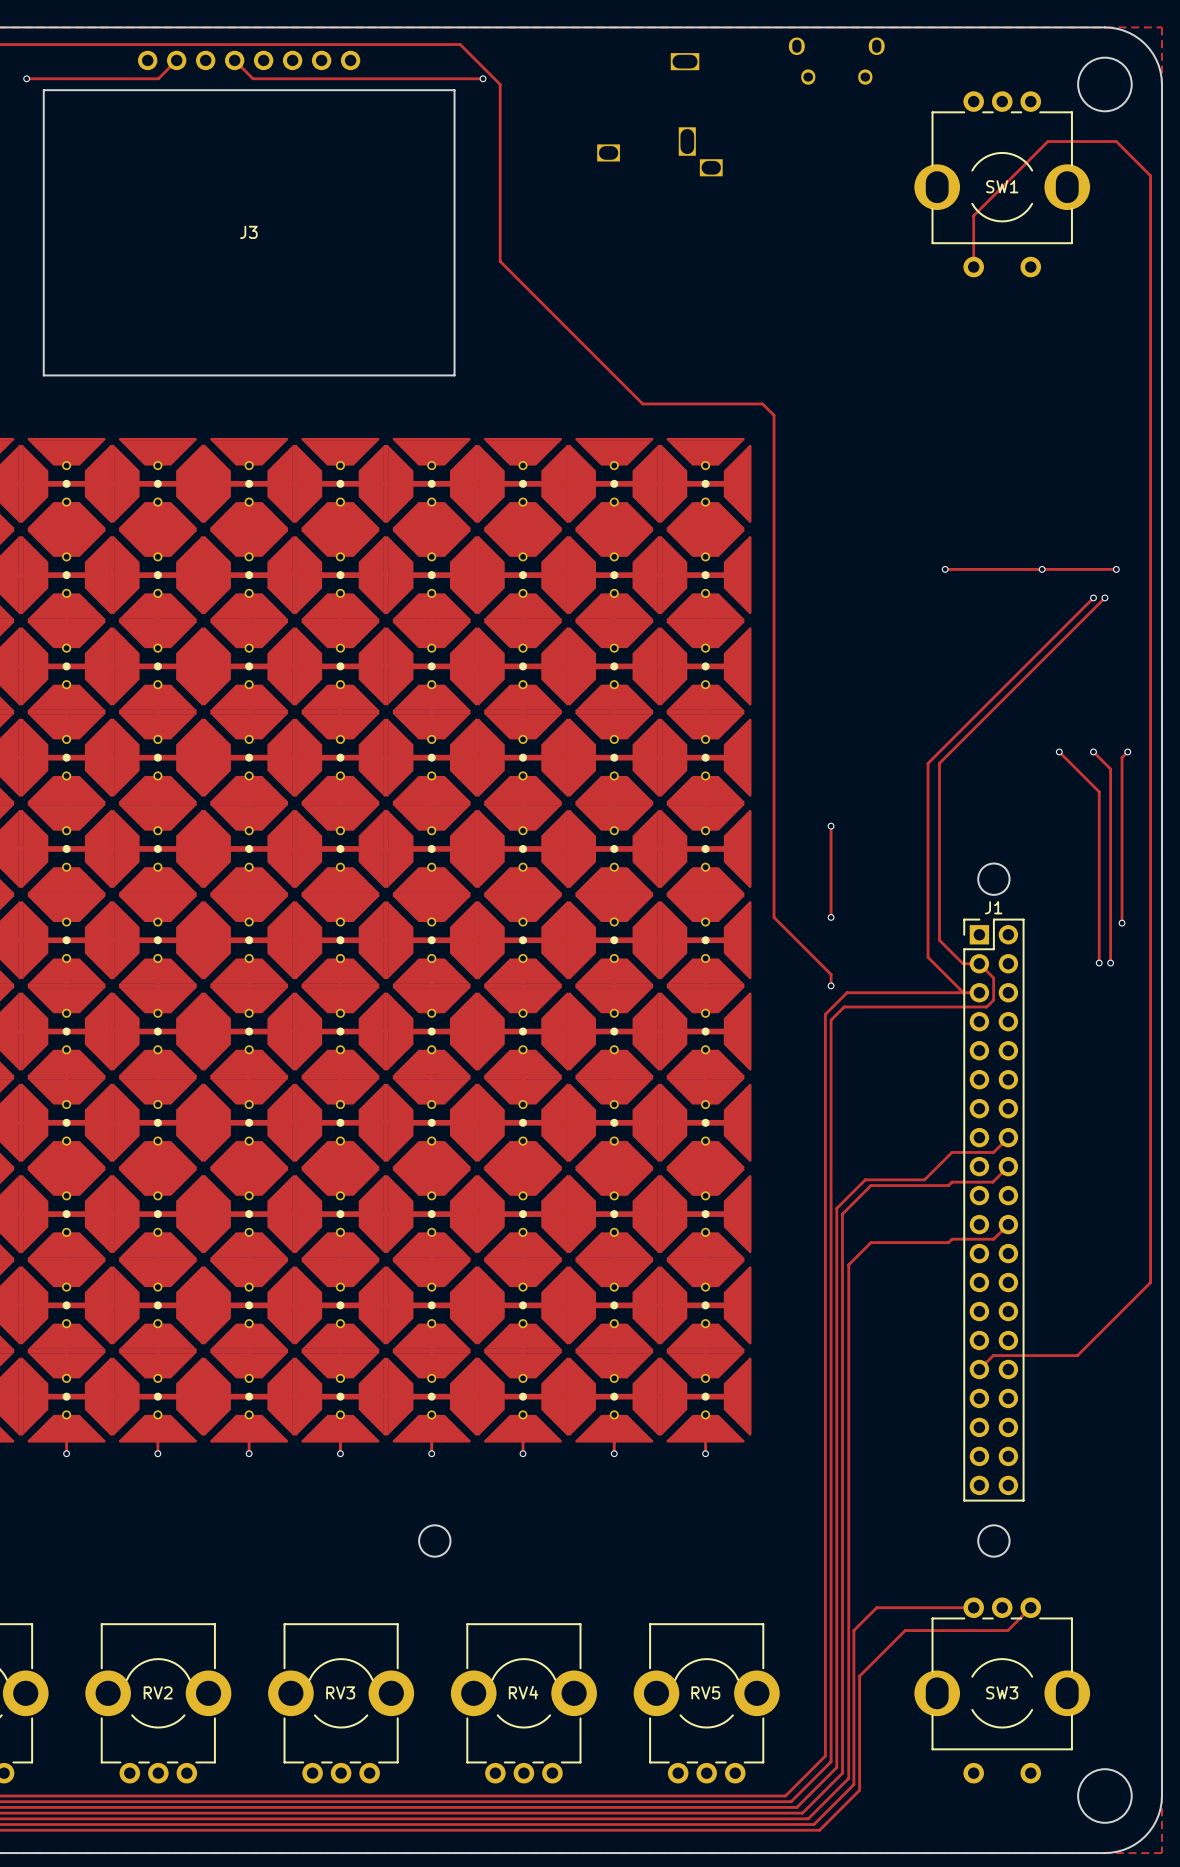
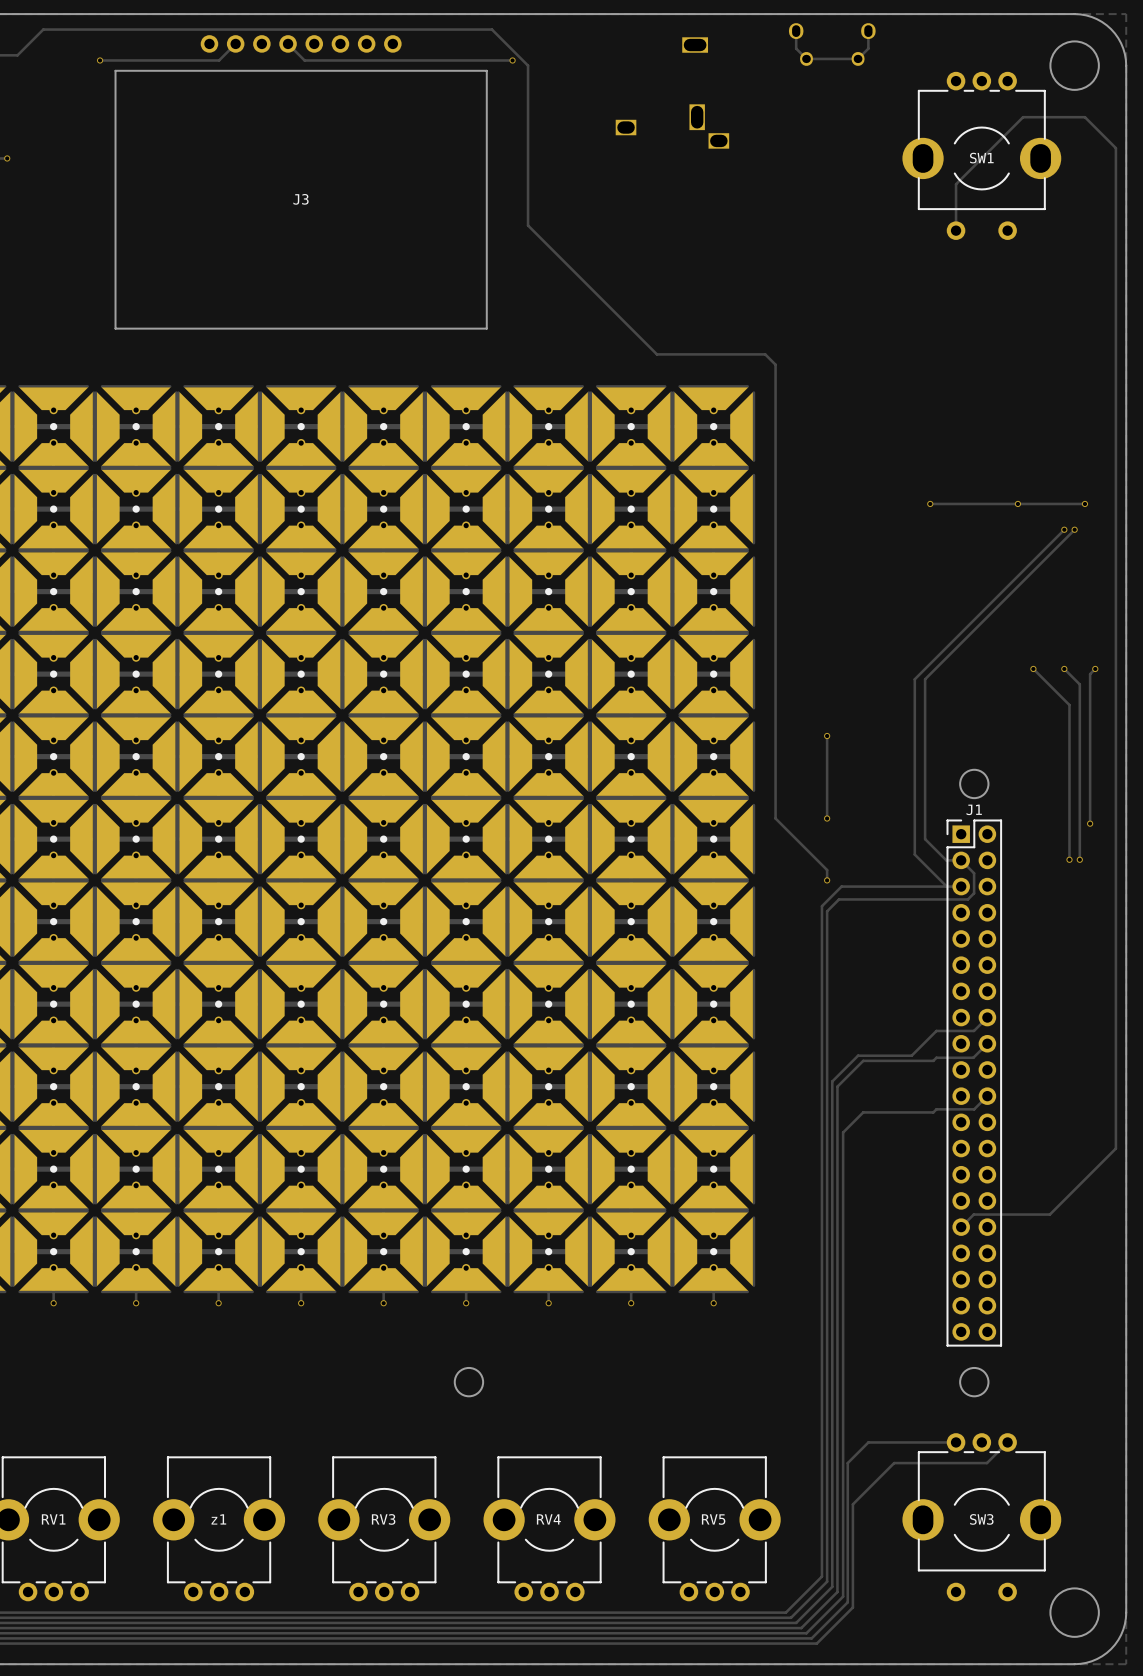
track: none -> (796, 31) (796, 48) (806, 58) (858, 58) (868, 48) (868, 31)
RV2 name: RV2 (158, 1692) -> z1 (218, 1519)

